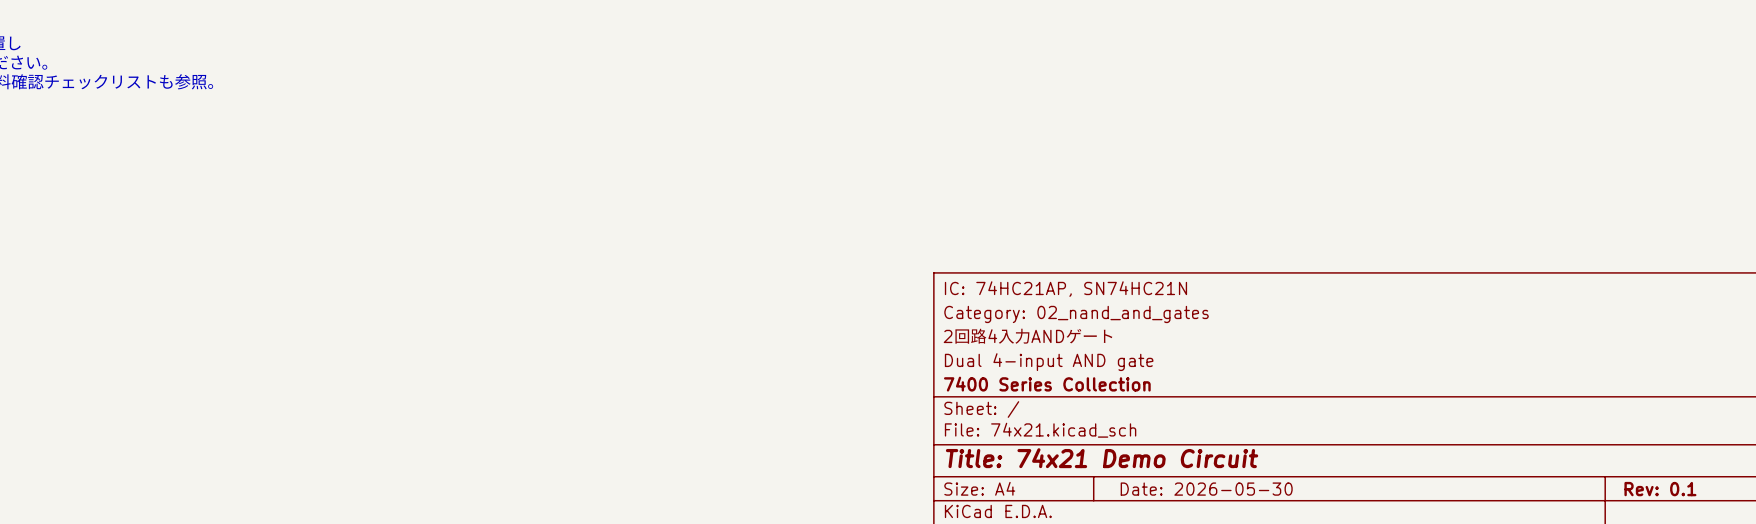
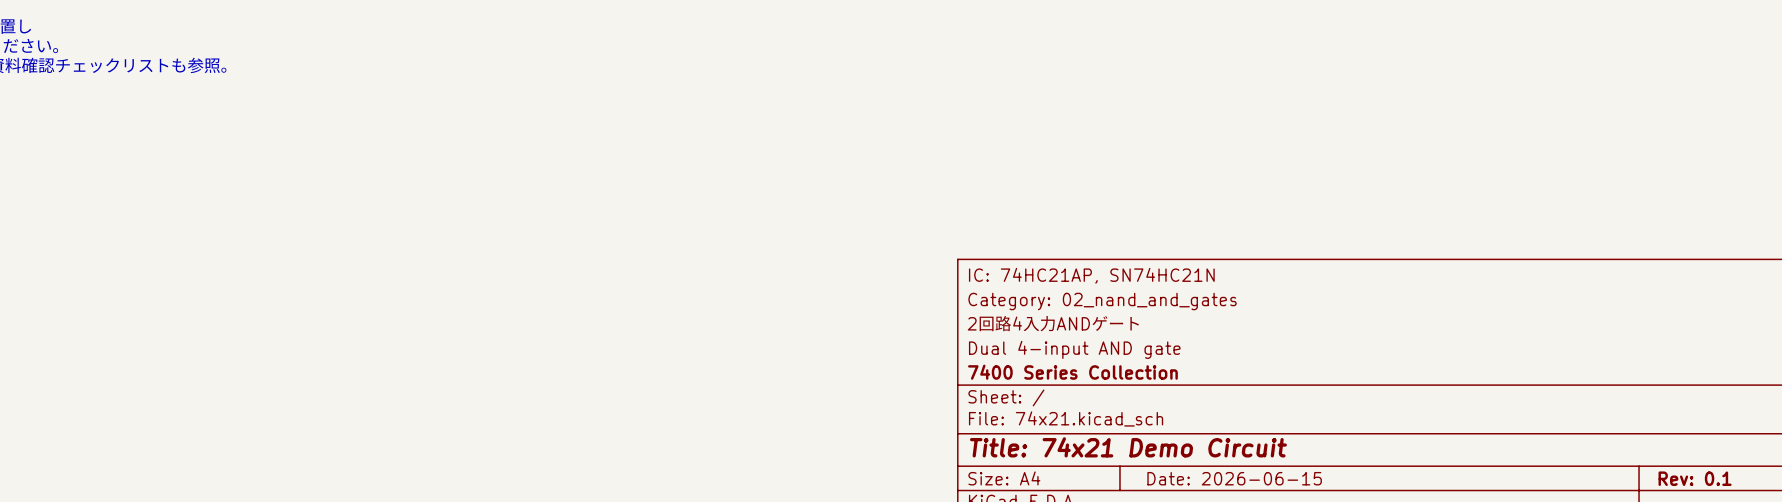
title block: Date: 2026-05-30 (1206, 489) -> Date: 2026-06-15 (1234, 478)

